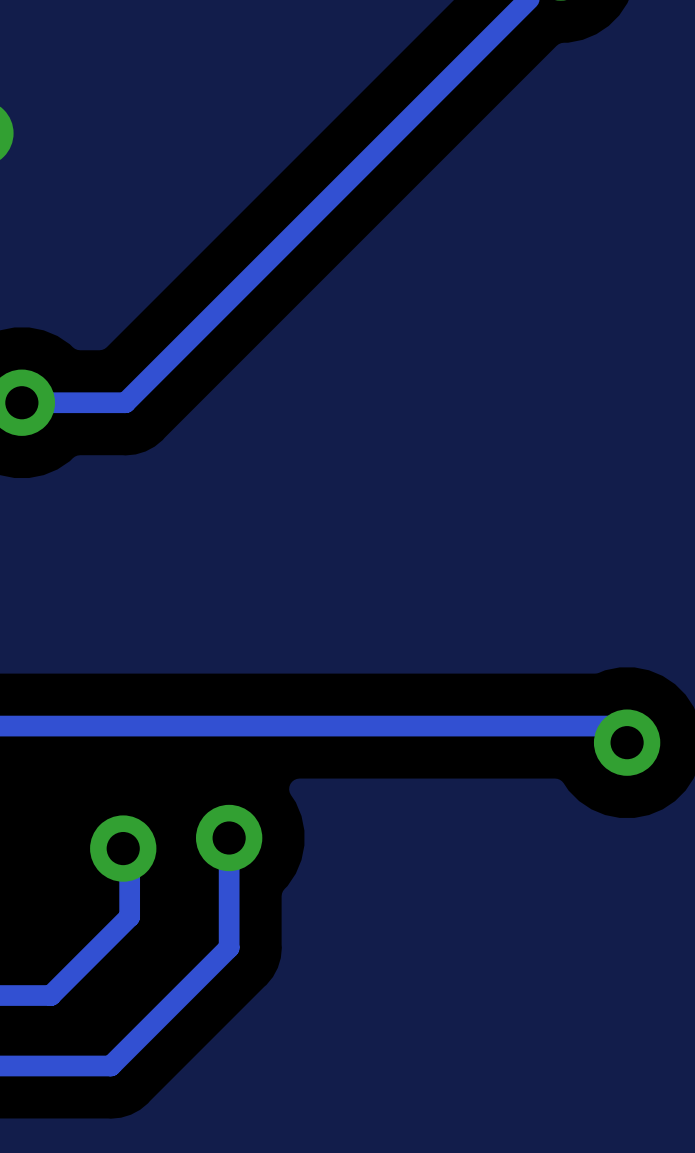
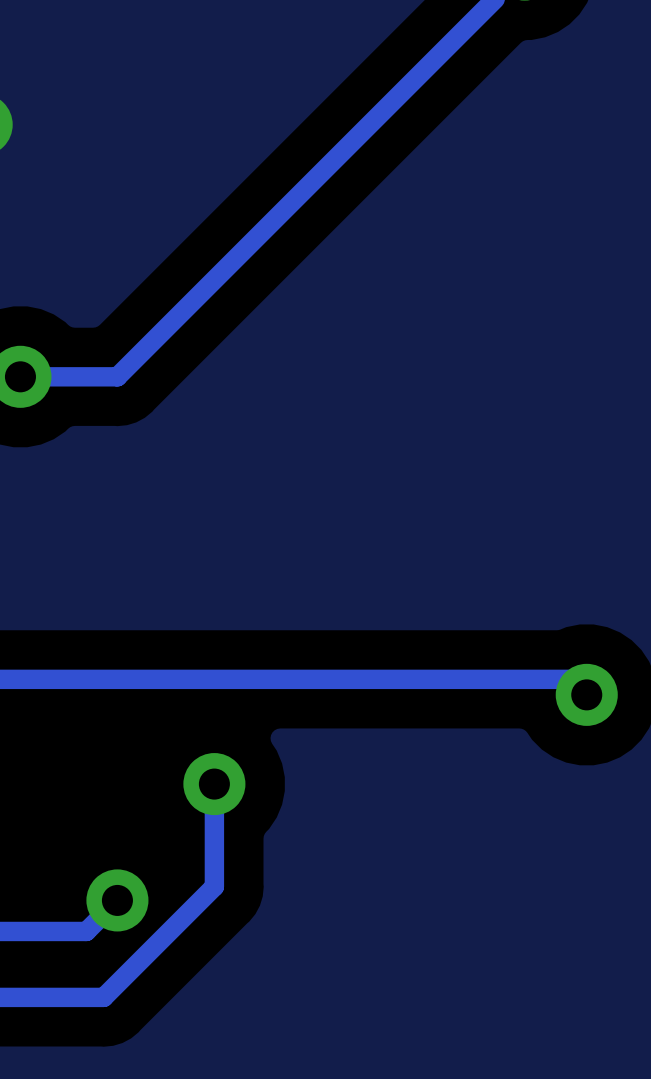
track: (123, 848) (129, 854) (129, 916) (50, 995) -> (117, 900) (86, 931) (47, 931)
via: (123, 848) -> none
via: none -> (117, 900)

